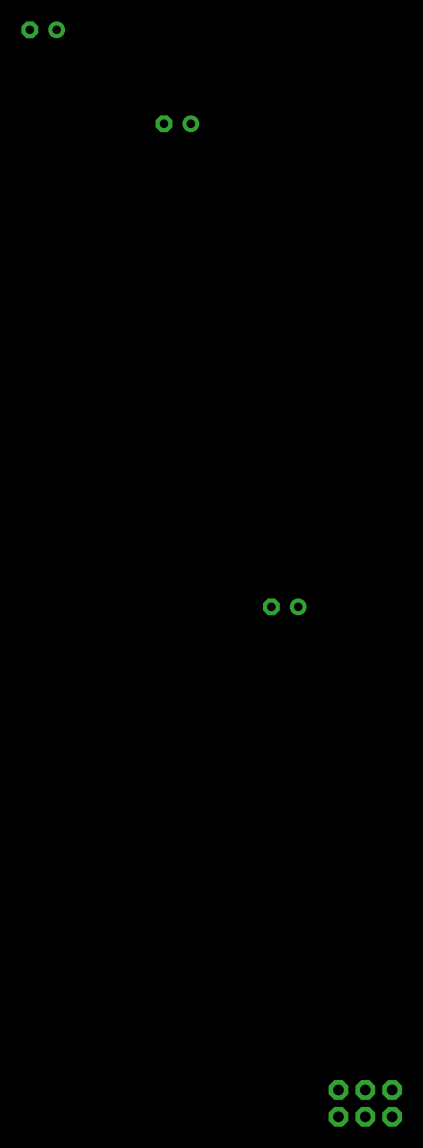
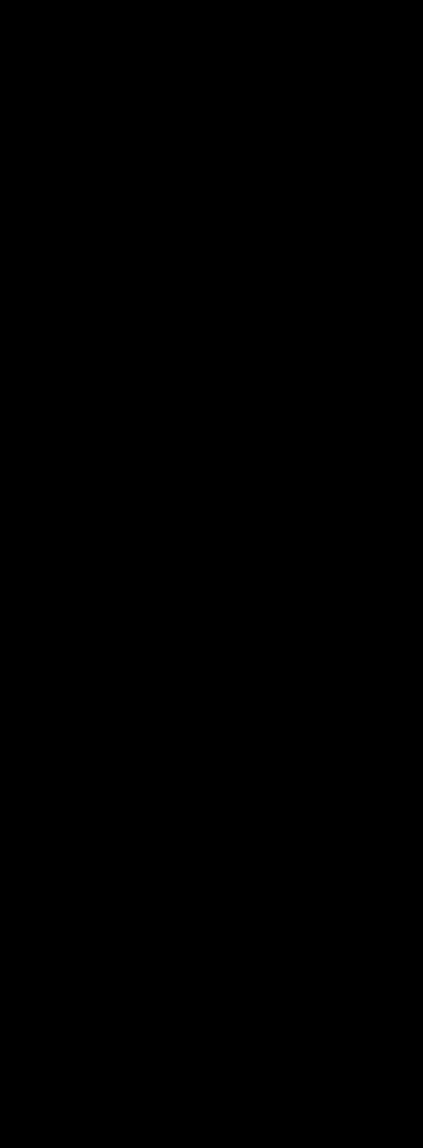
part: (43, 29) -> none
part: (177, 123) -> none
part: (284, 606) -> none
part: (365, 1103) -> none

